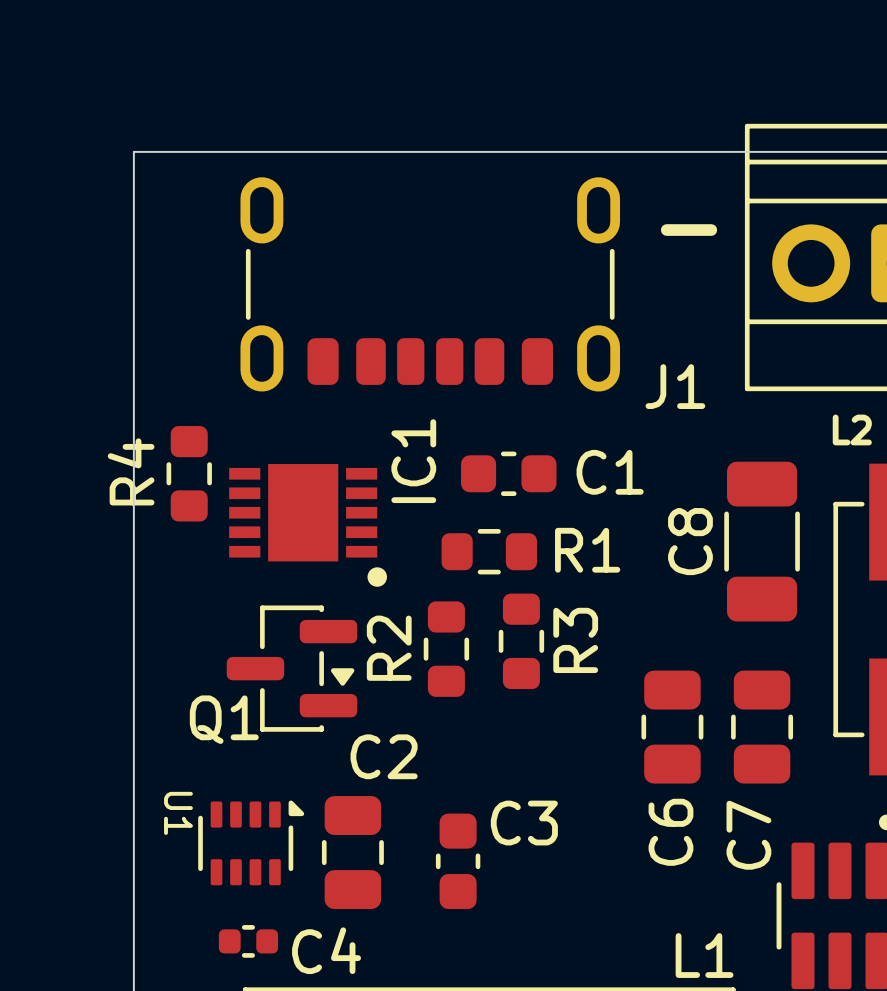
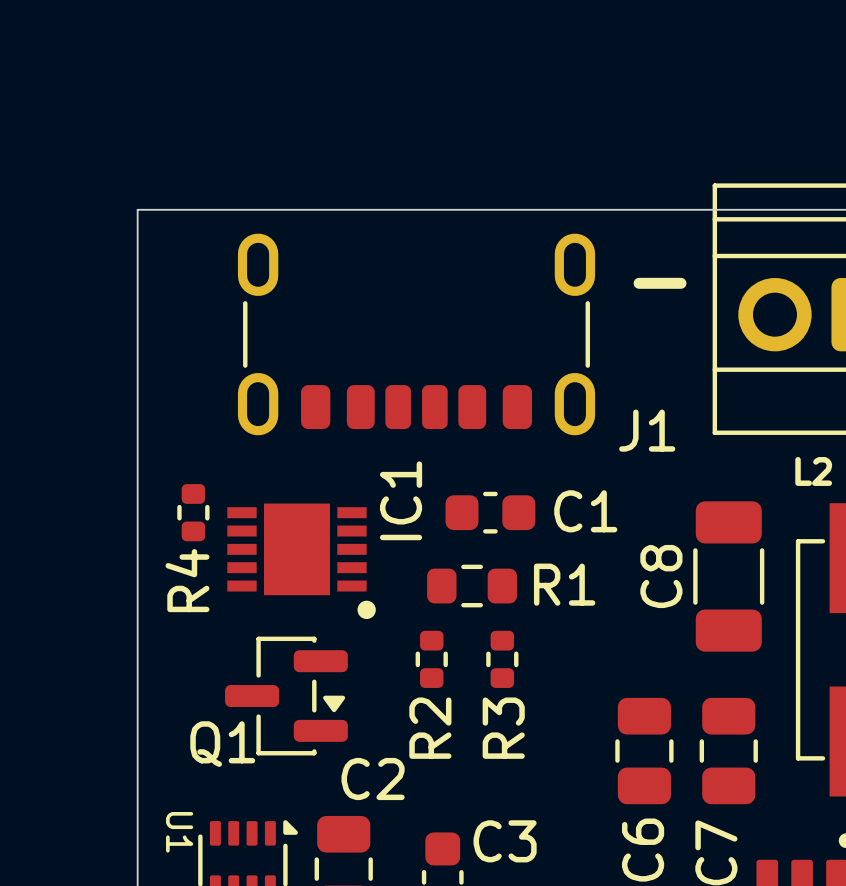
R4 footprint: [166, 426, 212, 522] -> [177, 484, 210, 542]
R4 name position: R4 (131, 471) -> R4 (187, 580)
R3 footprint: [498, 593, 545, 690] -> [486, 630, 519, 688]
R2 footprint: [423, 601, 470, 697] -> [415, 630, 448, 688]
R3 name position: R3 (575, 640) -> R3 (503, 728)
R2 name position: R2 (389, 648) -> R2 (430, 728)

